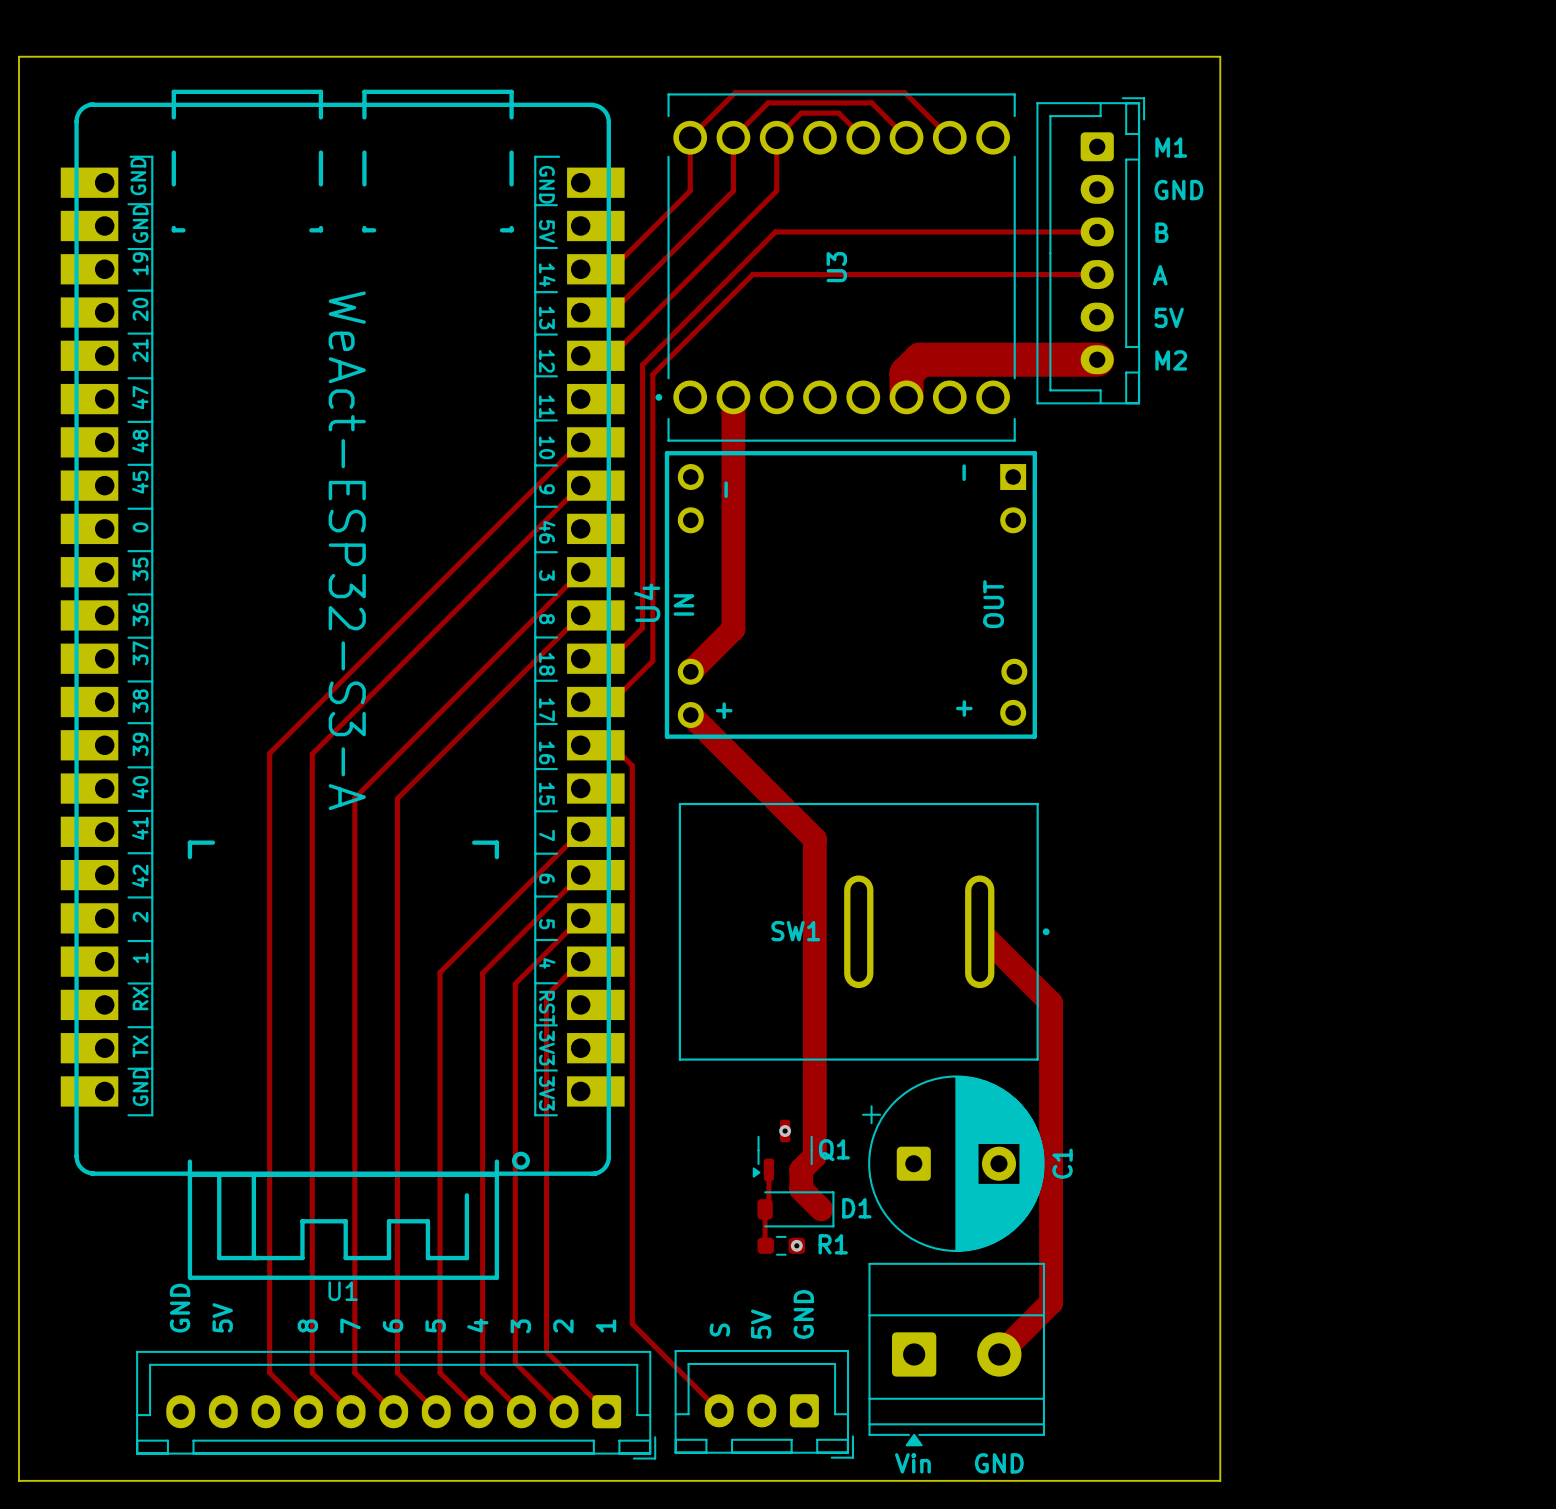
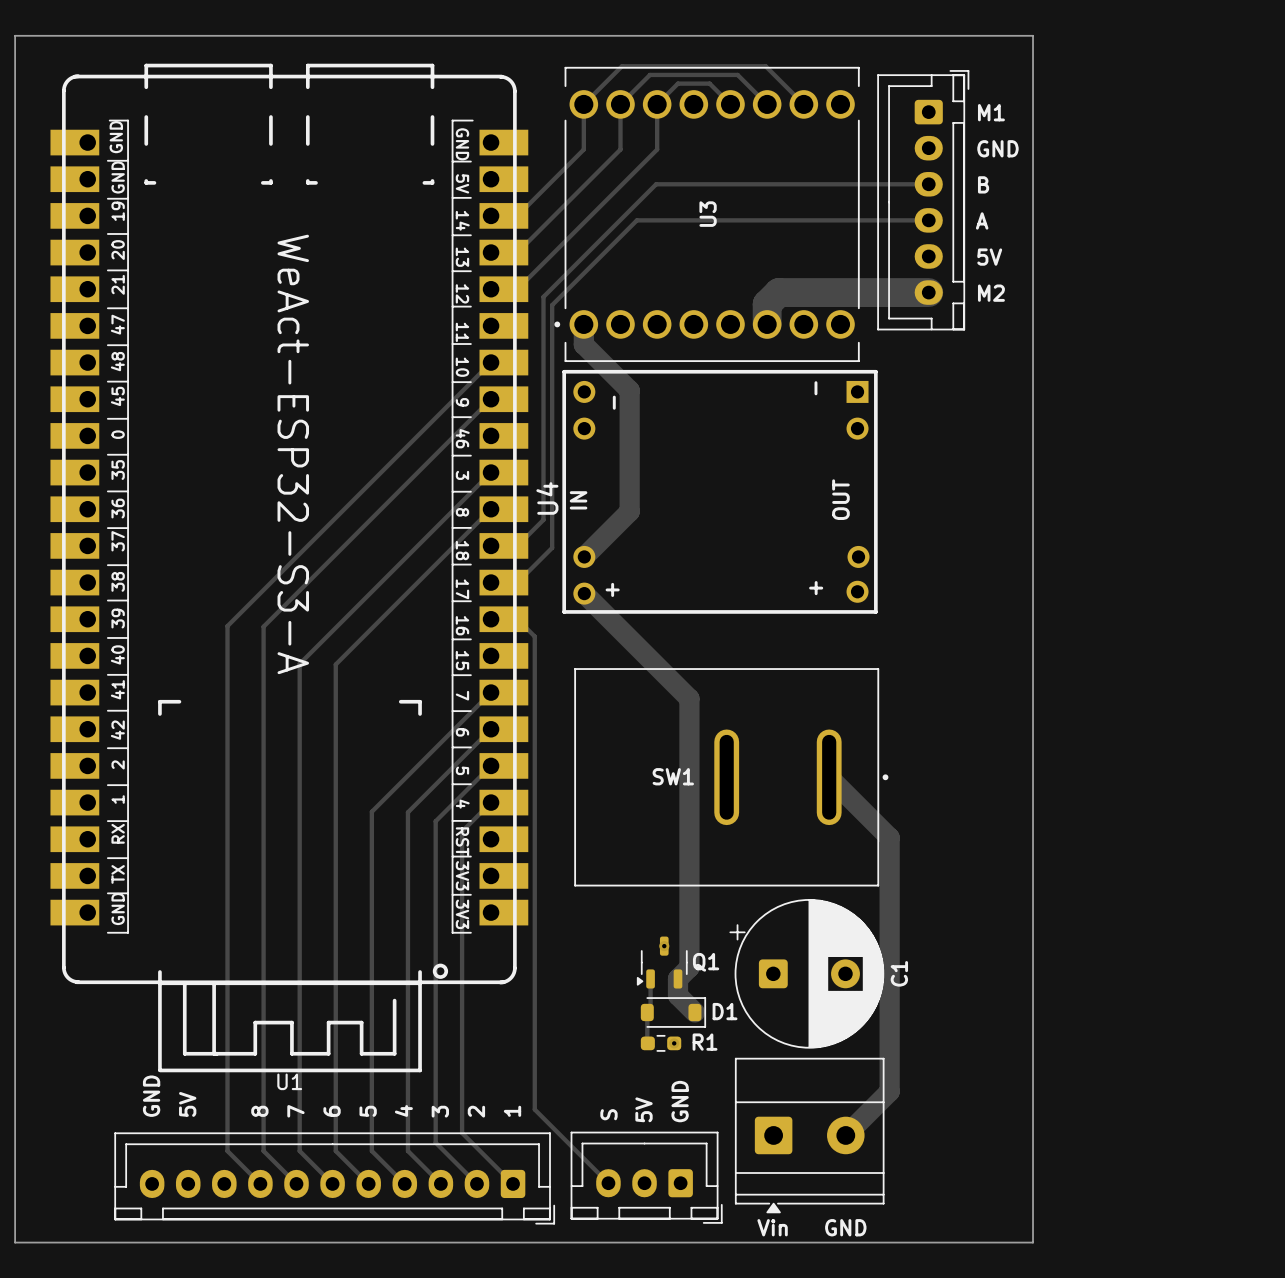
track: (733, 397) (733, 629) -> (583, 324) (583, 344) (629, 390) (629, 511) (620, 520)

